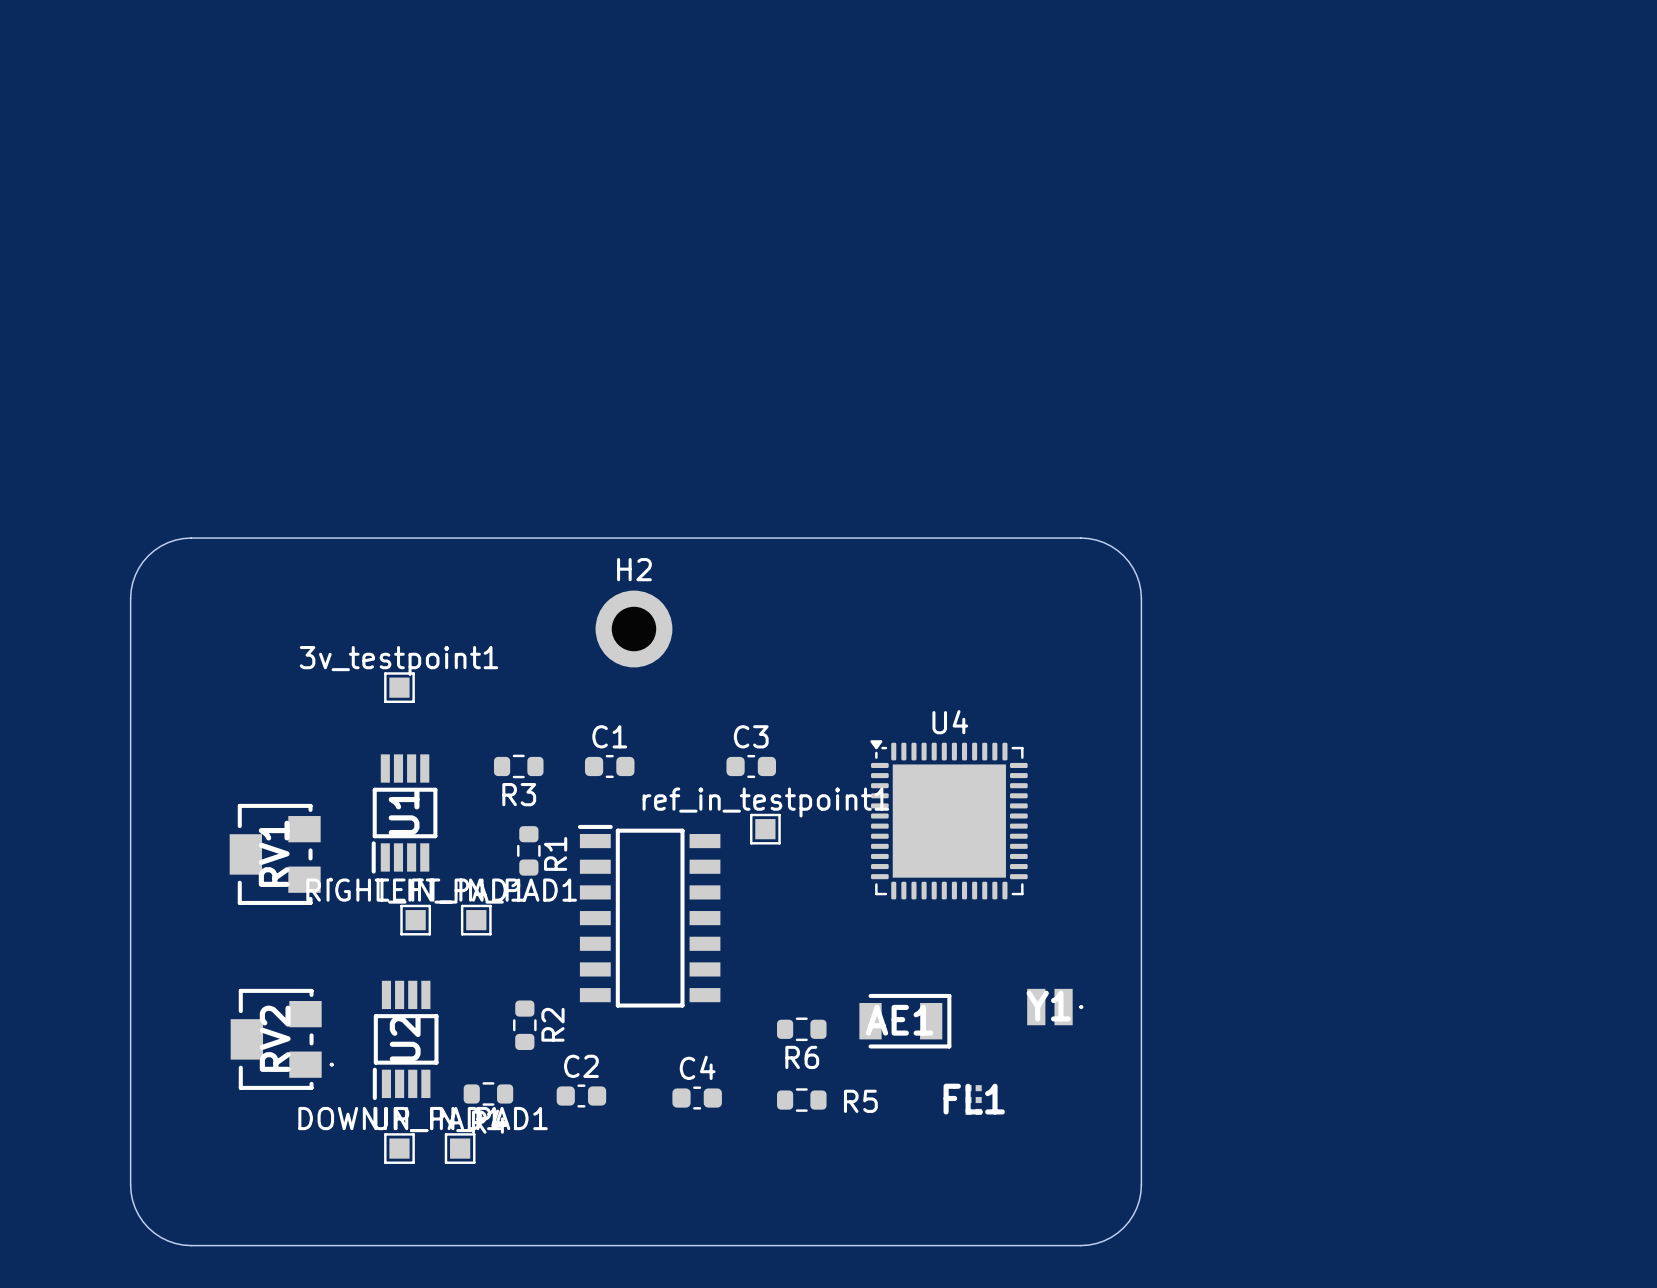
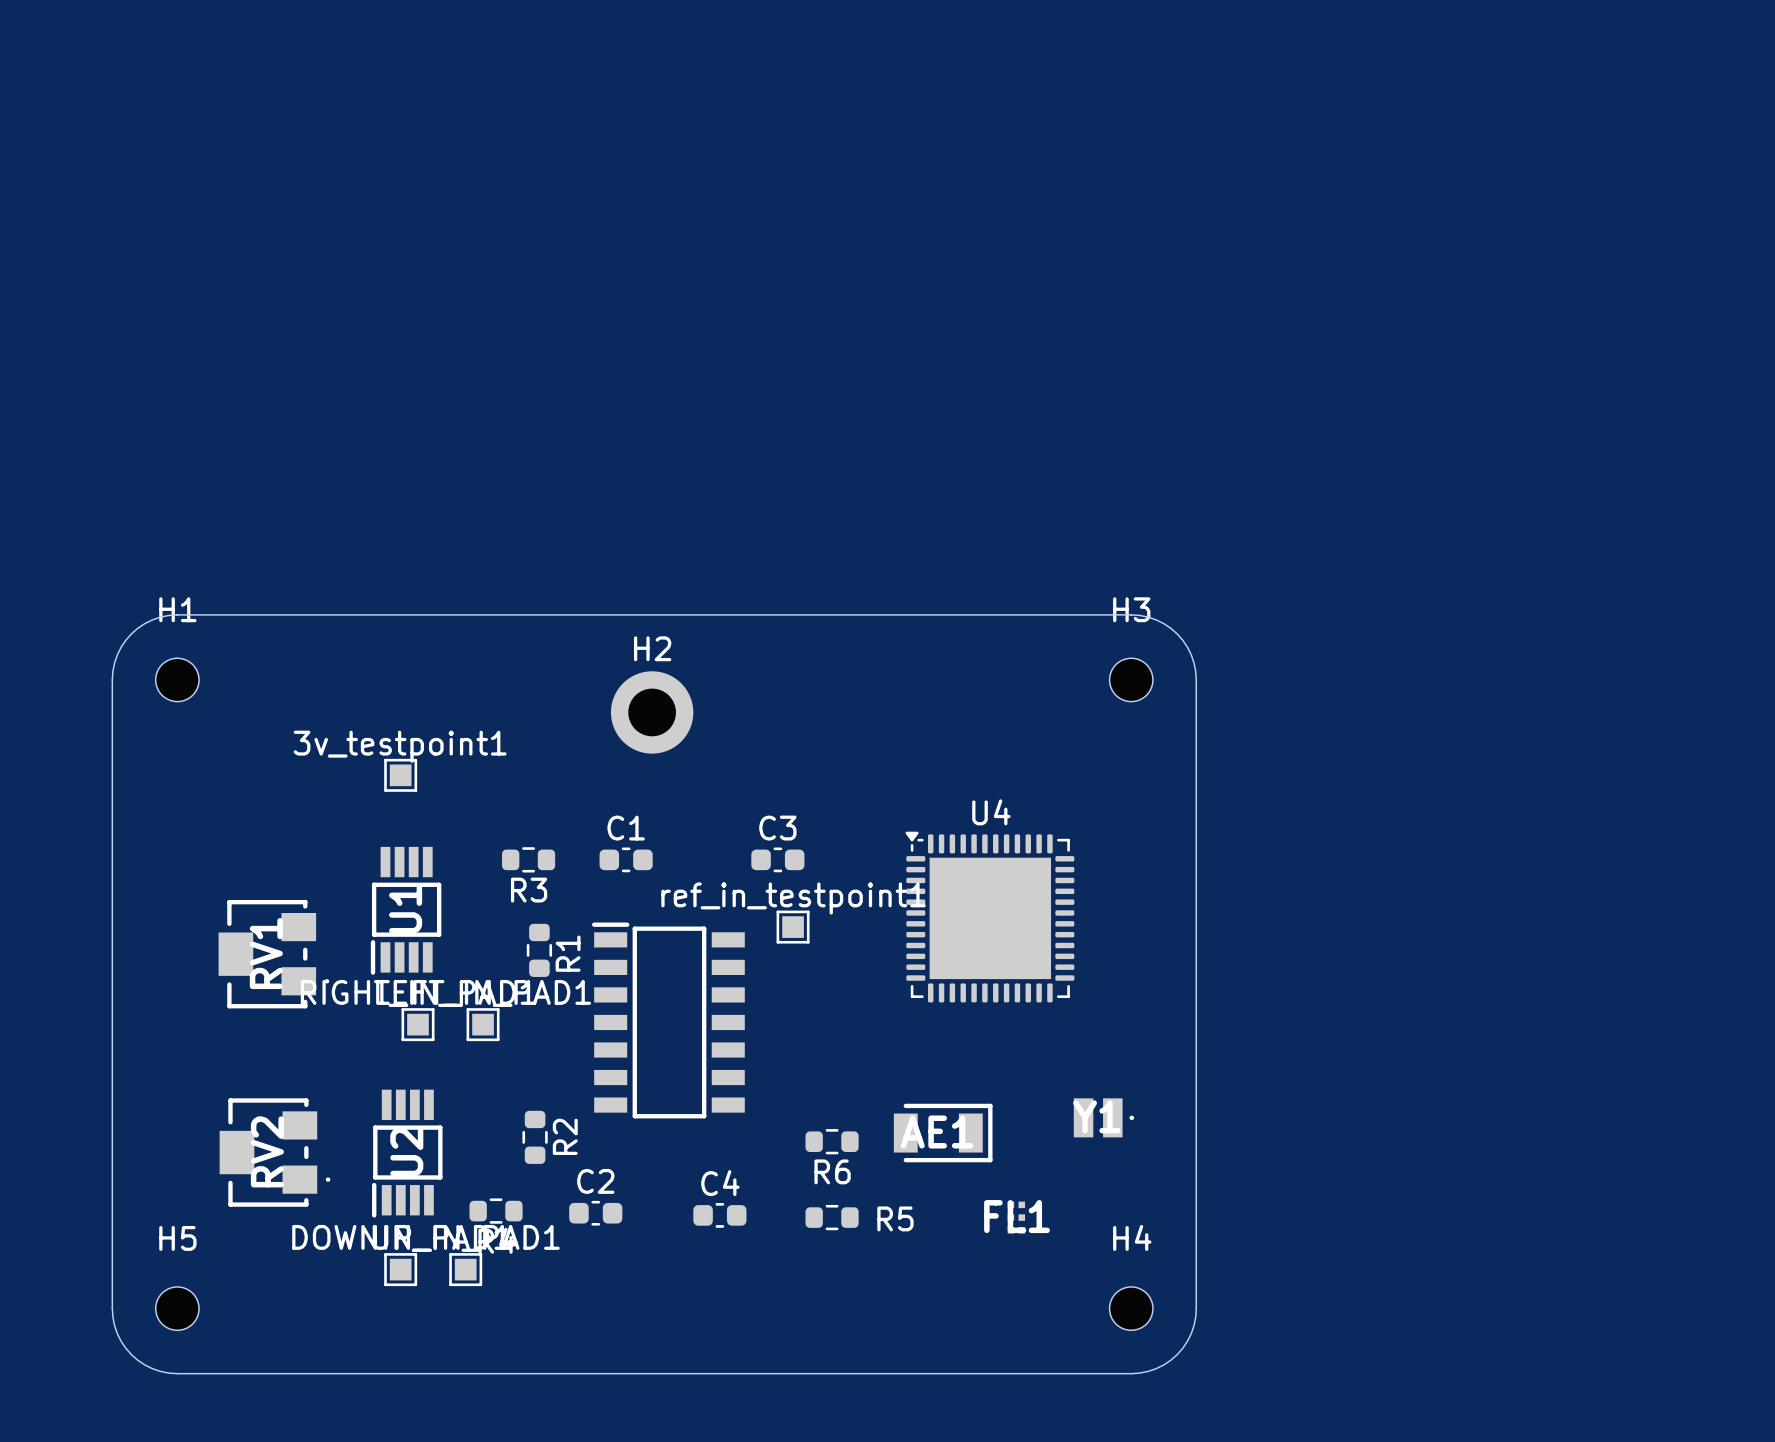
H1: none -> (177, 679)
H3: none -> (1131, 679)
H5: none -> (177, 1308)
H4: none -> (1131, 1308)

